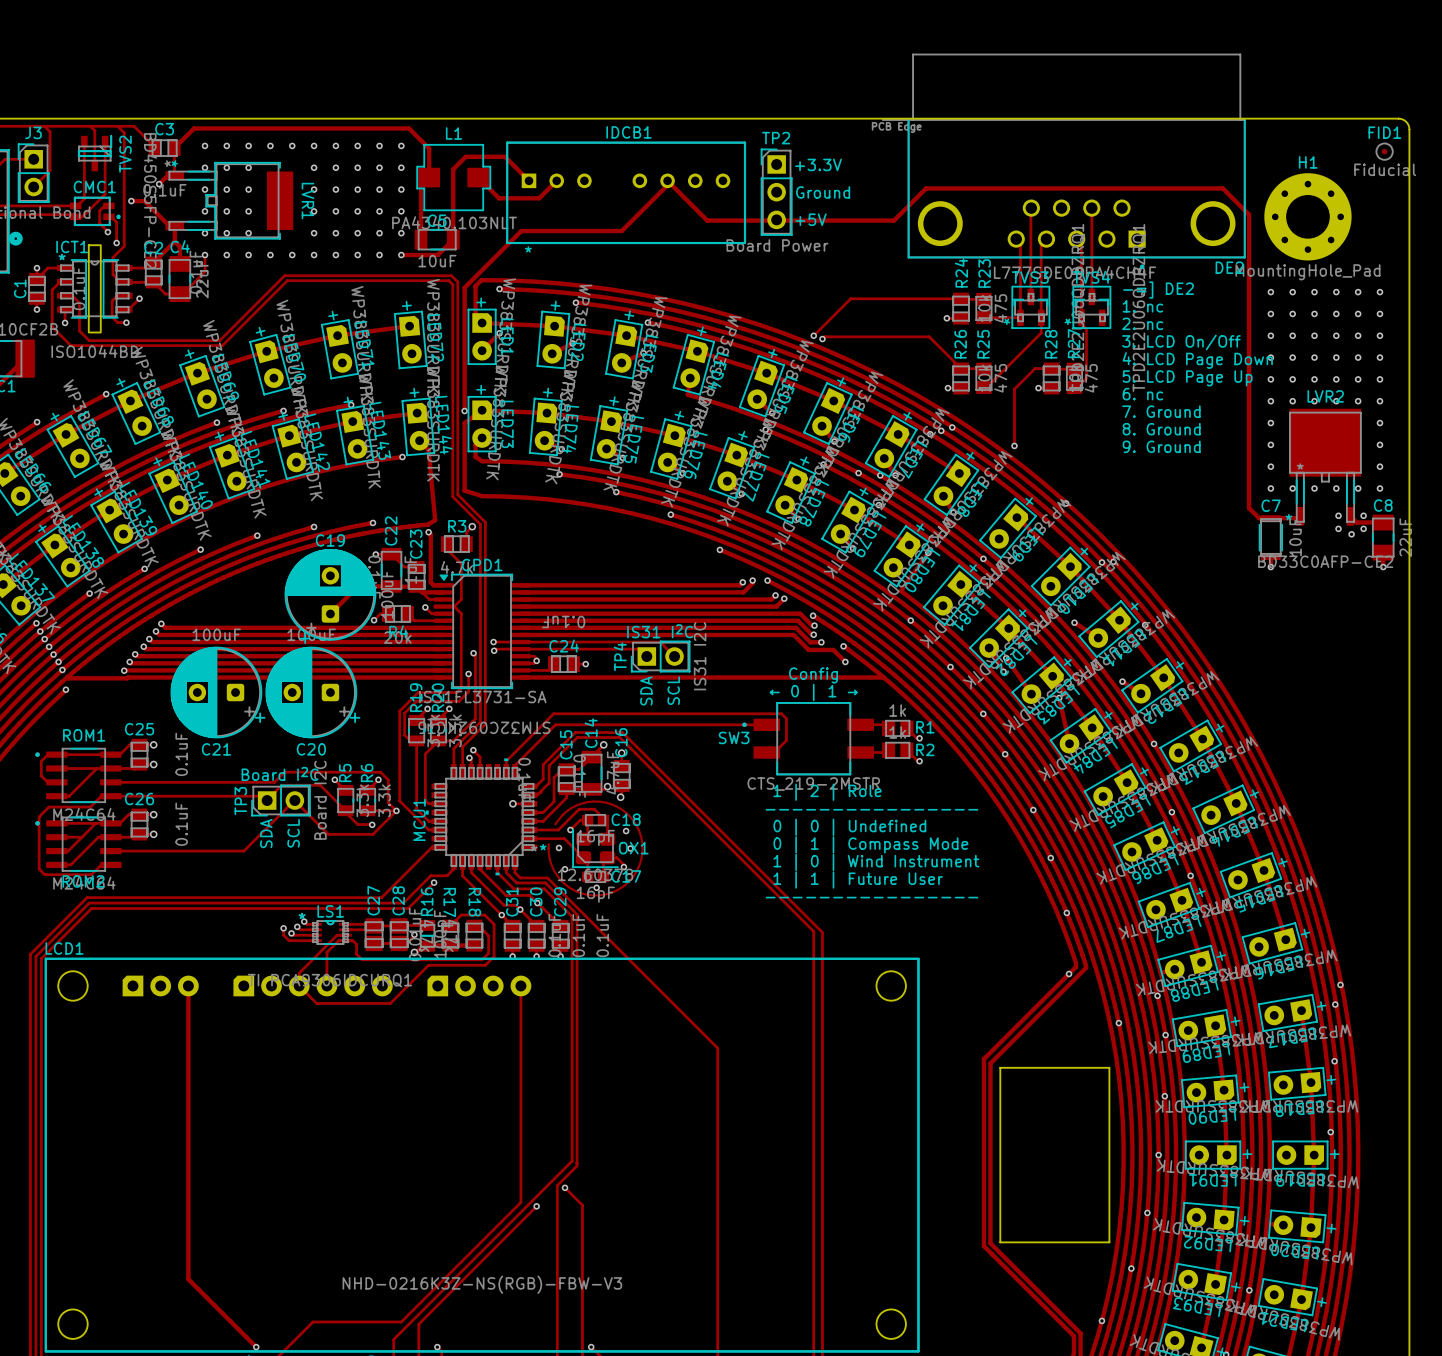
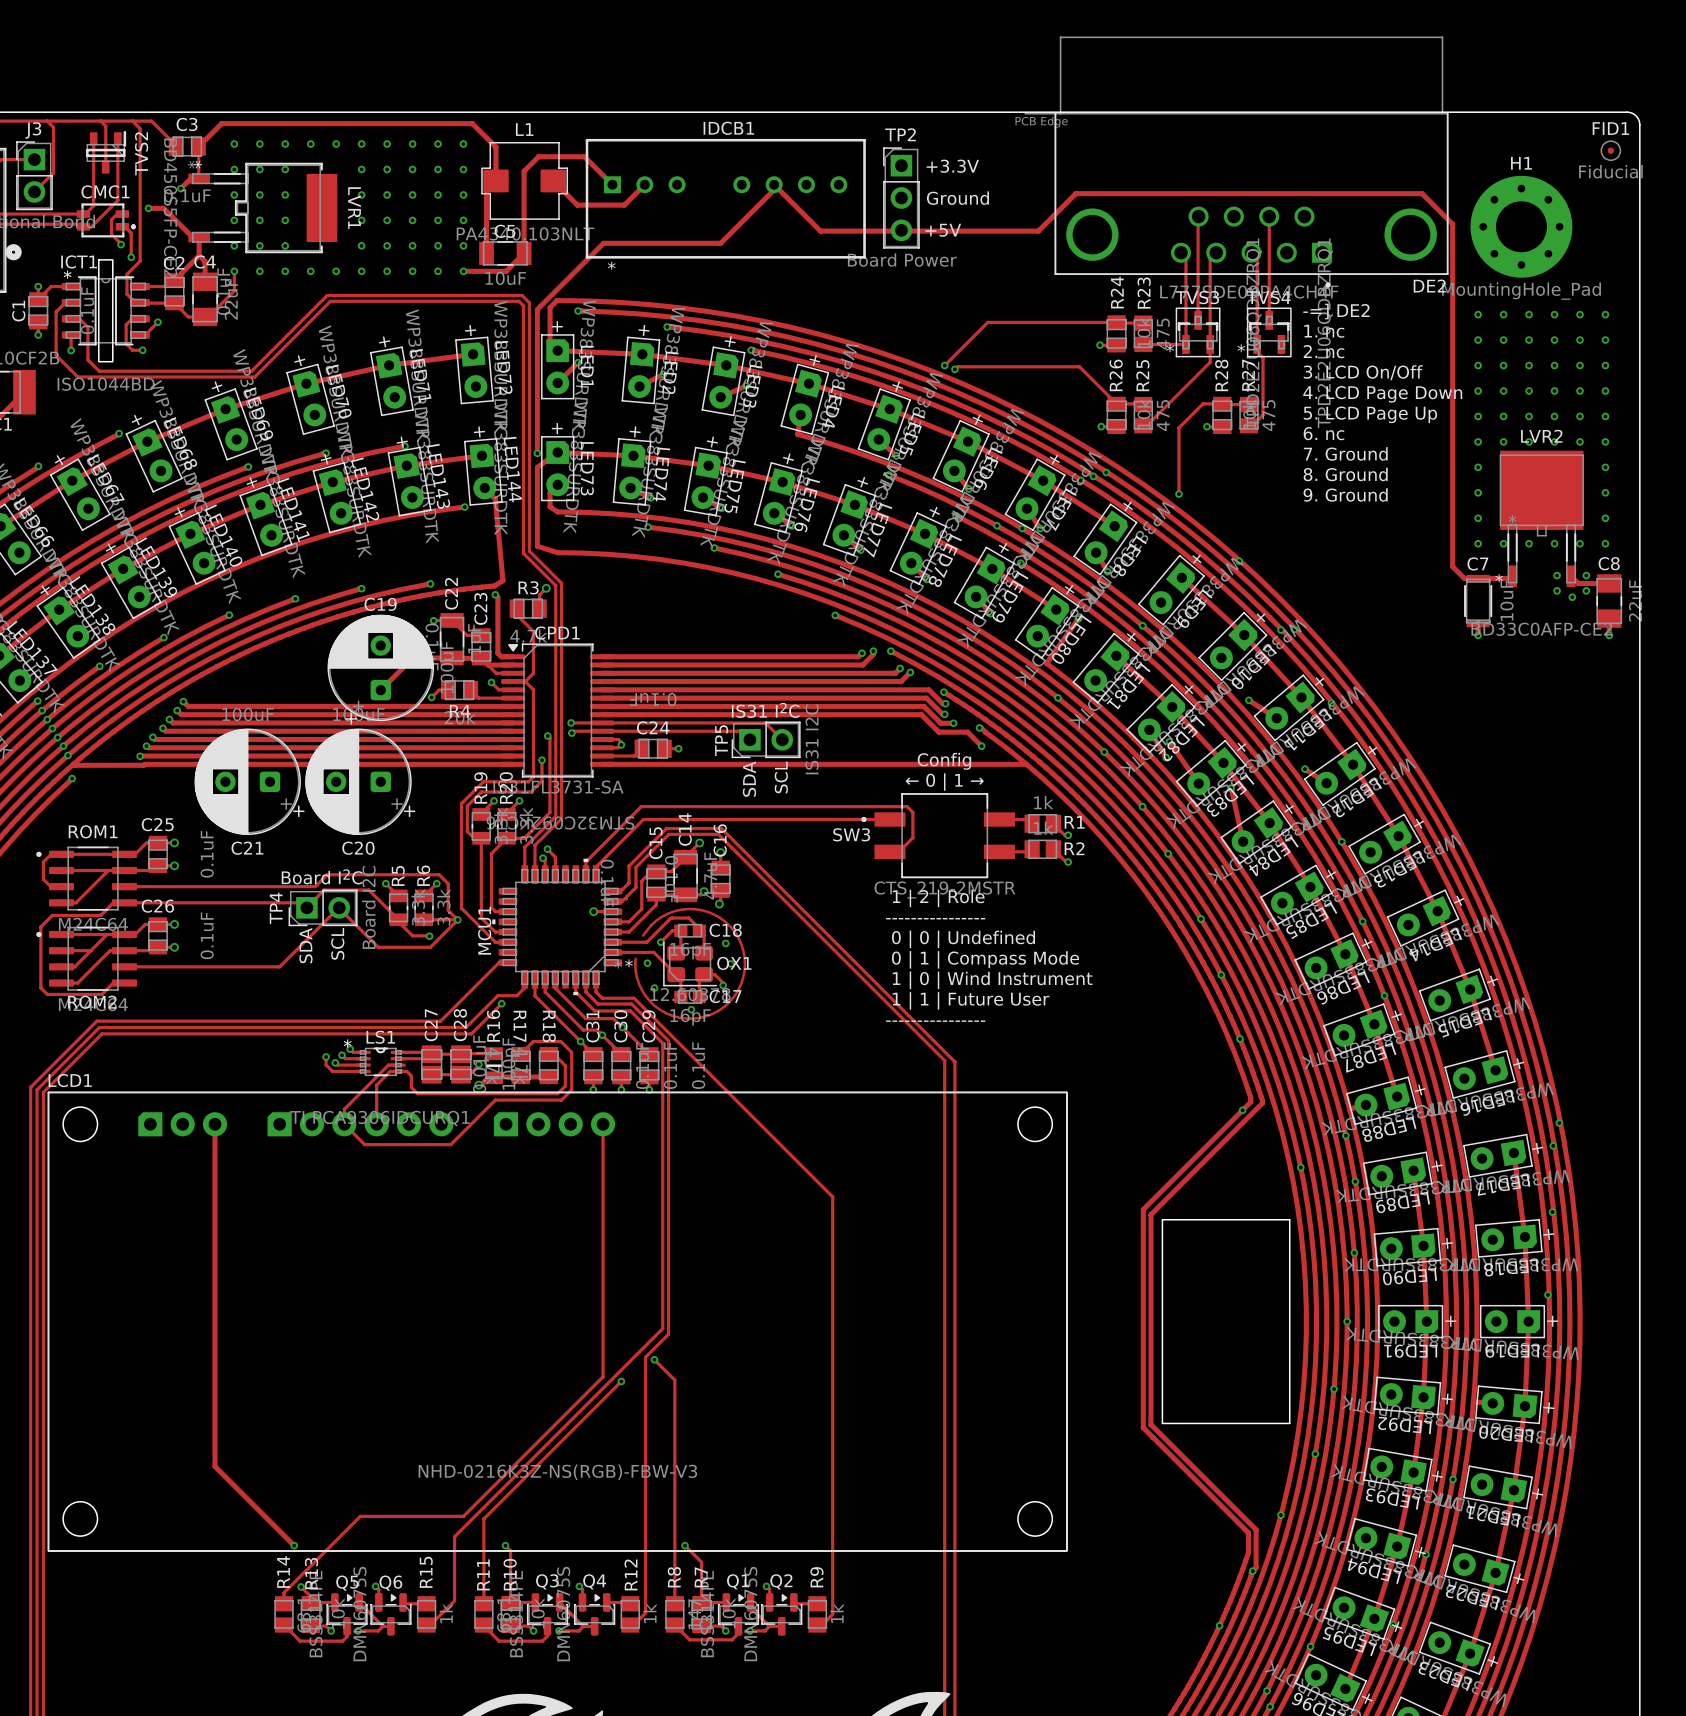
TP4 name: TP4 (620, 656) -> TP5 (721, 740)
TP3 name: TP3 (240, 801) -> TP4 (276, 908)

